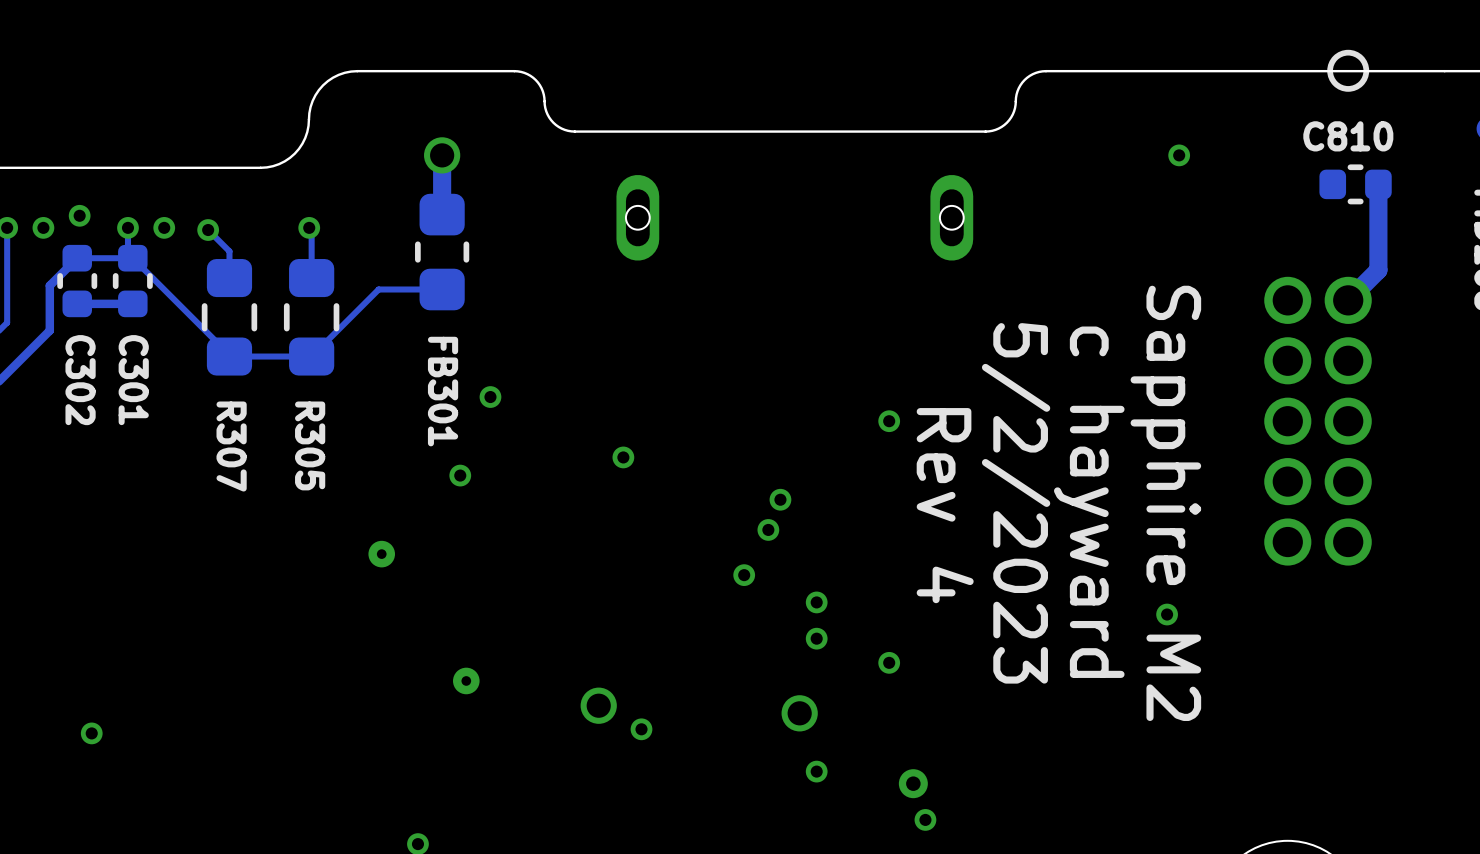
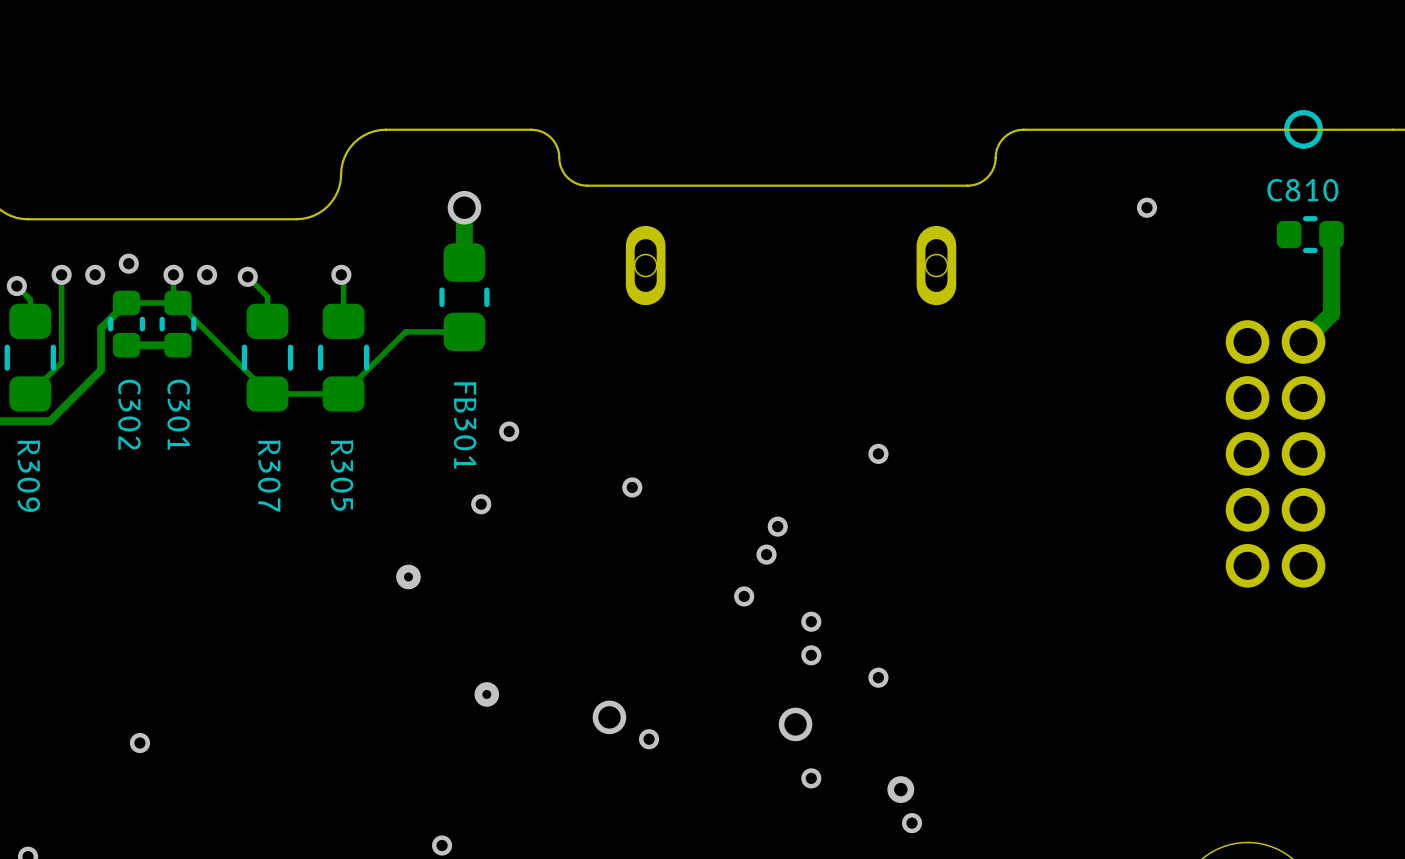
text: c hayward (1089, 502) -> none
text: 5/2/2023 (1016, 503) -> none
text: Sapphire M2 (1165, 503) -> none
text: Rev 4 (945, 505) -> none
via: (1167, 614) -> none

